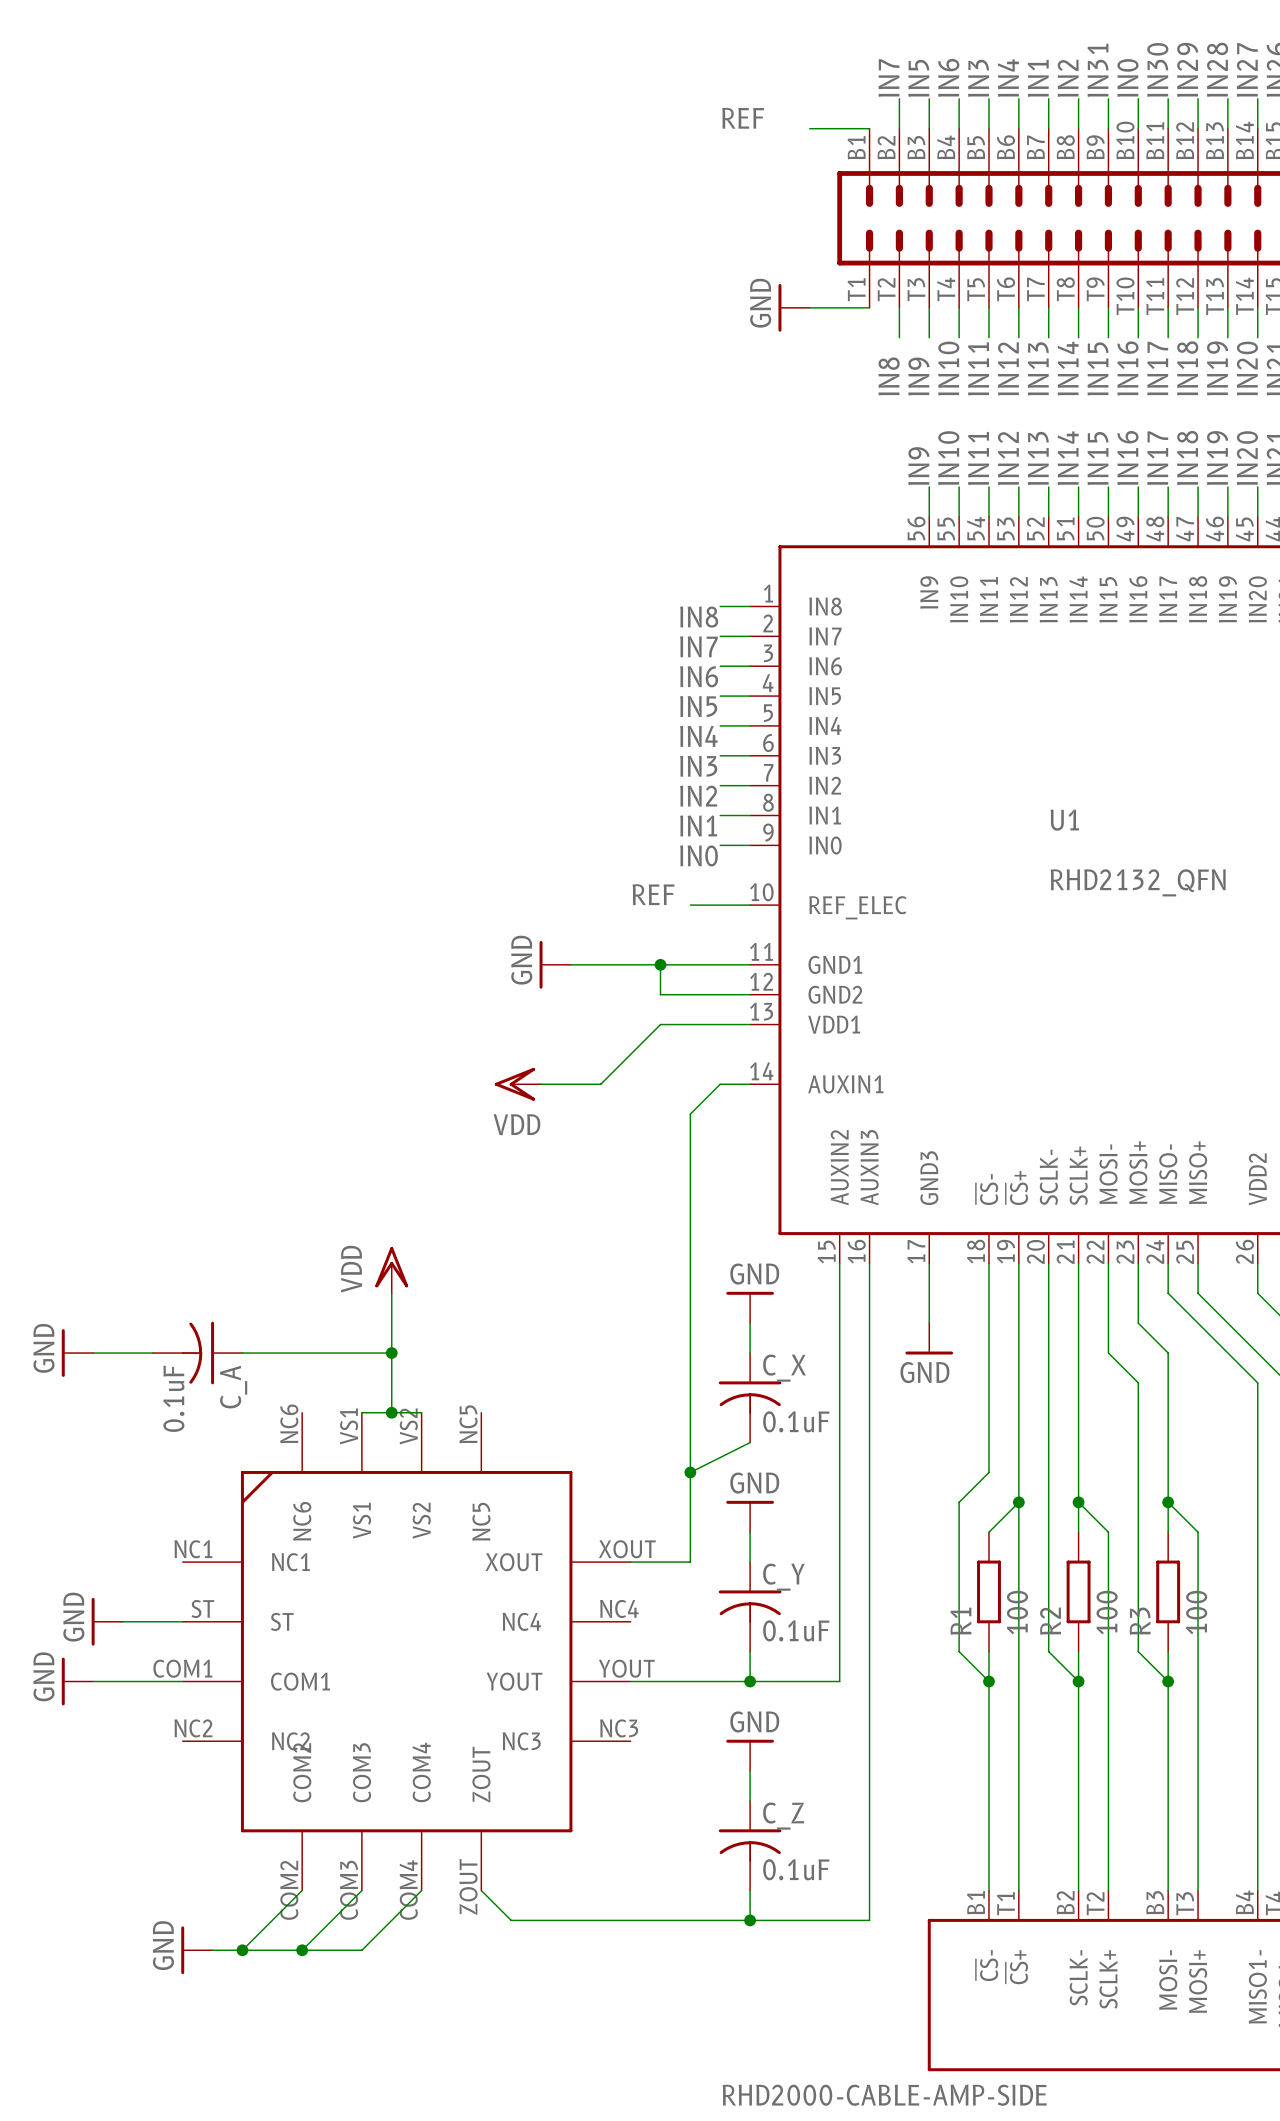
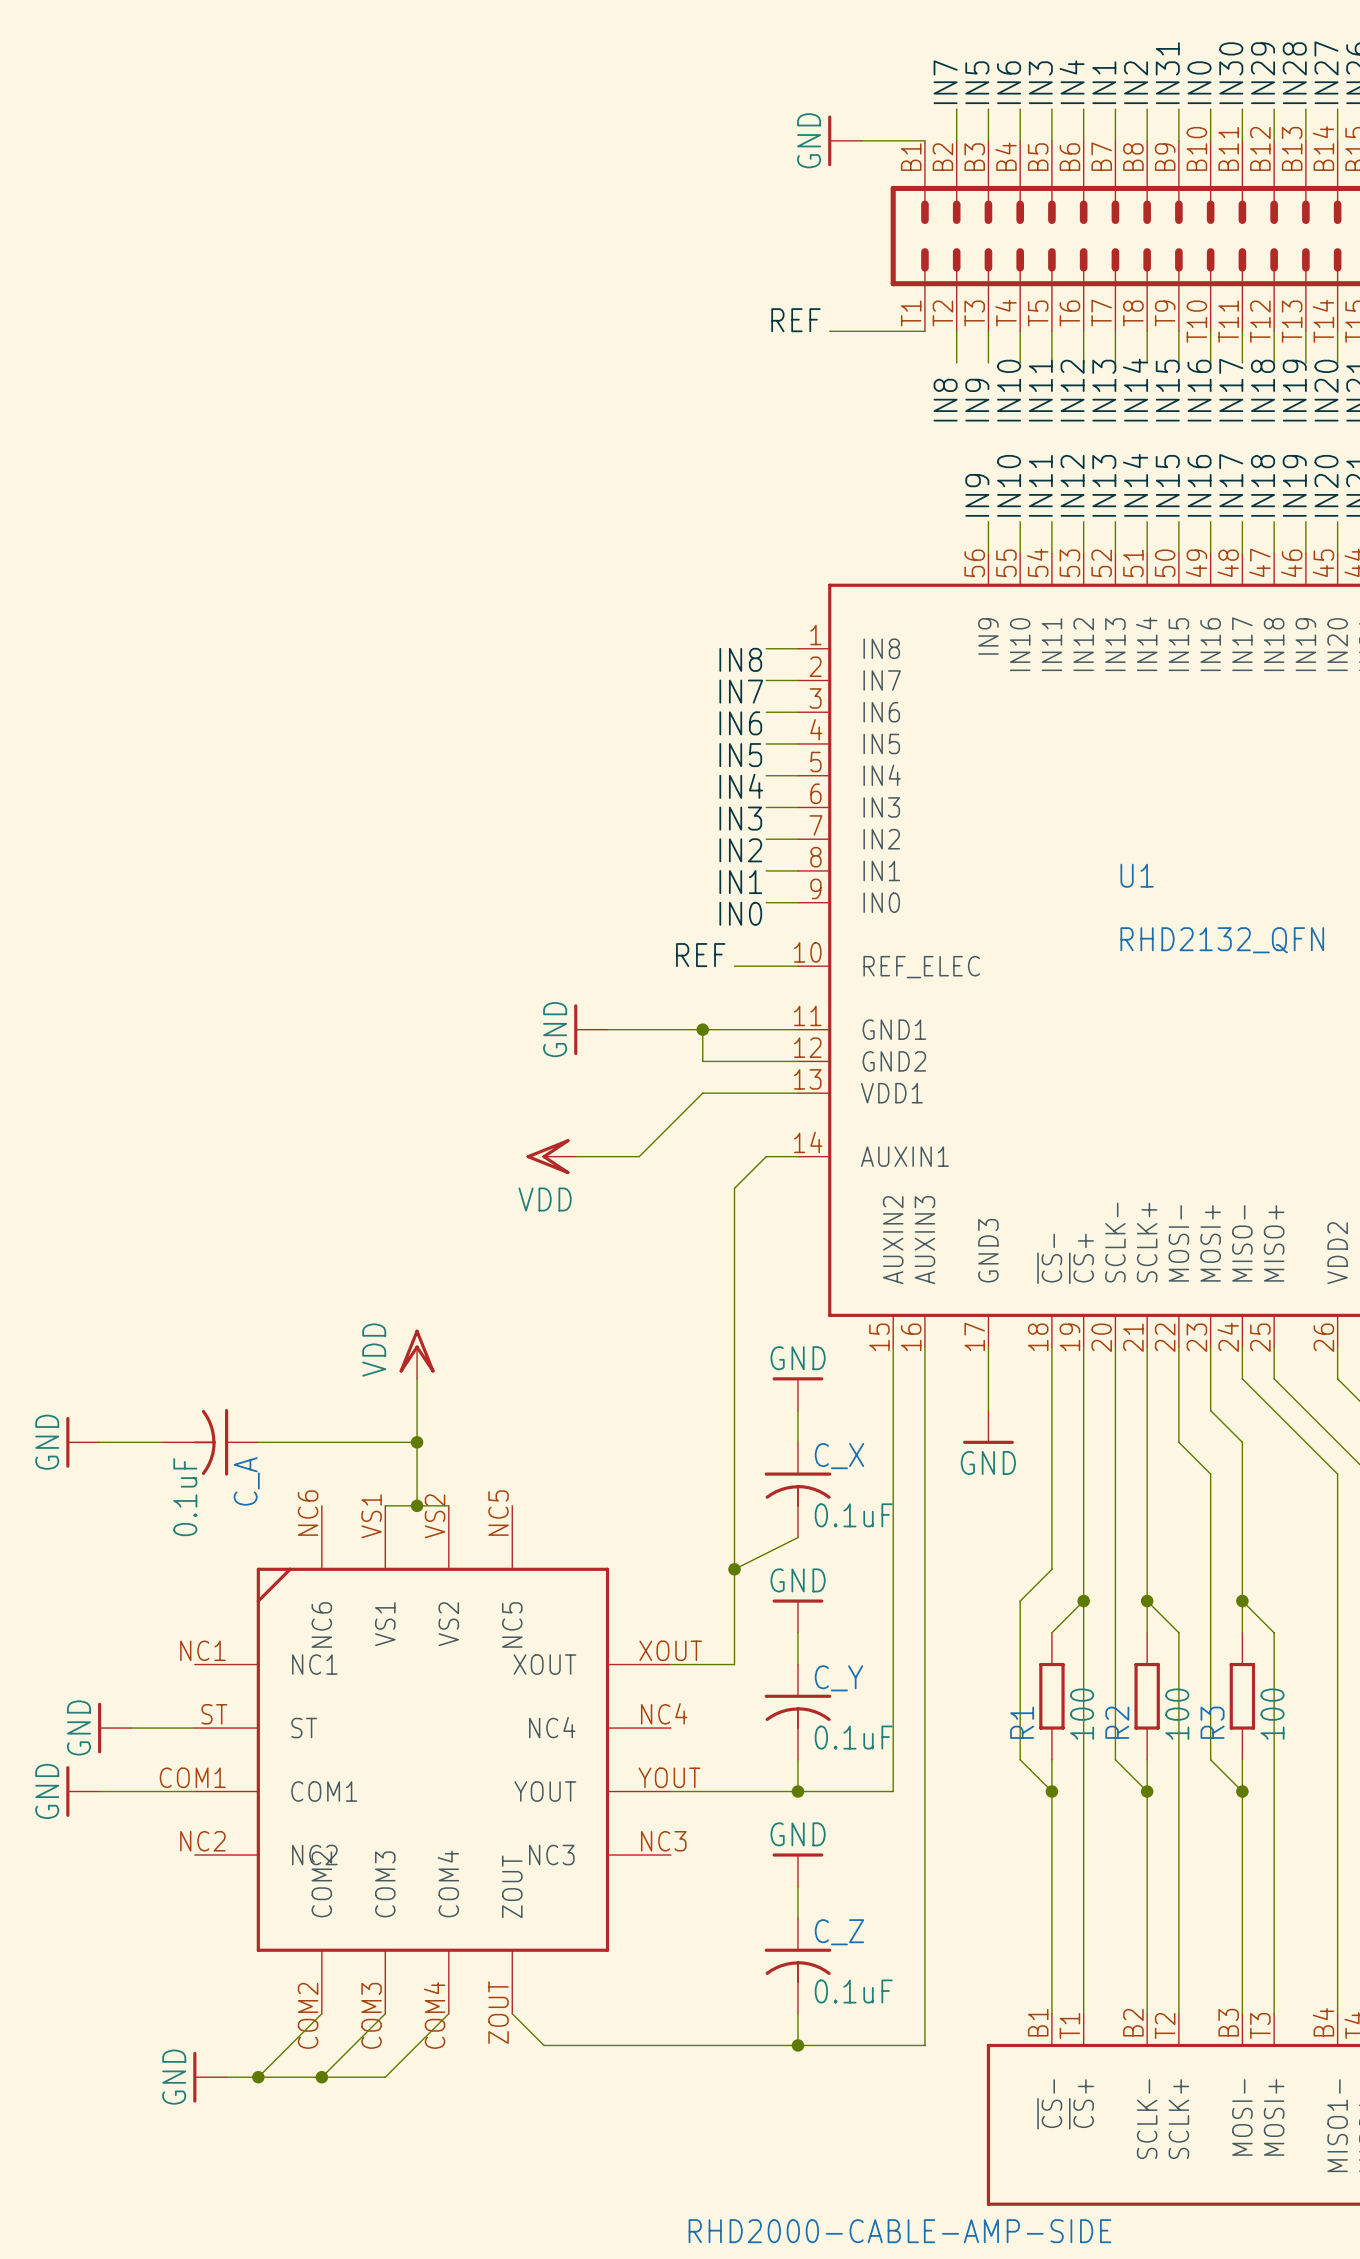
label position: REF (743, 118) -> REF (795, 320)
power symbol position: GND (794, 307) -> GND (844, 140)

